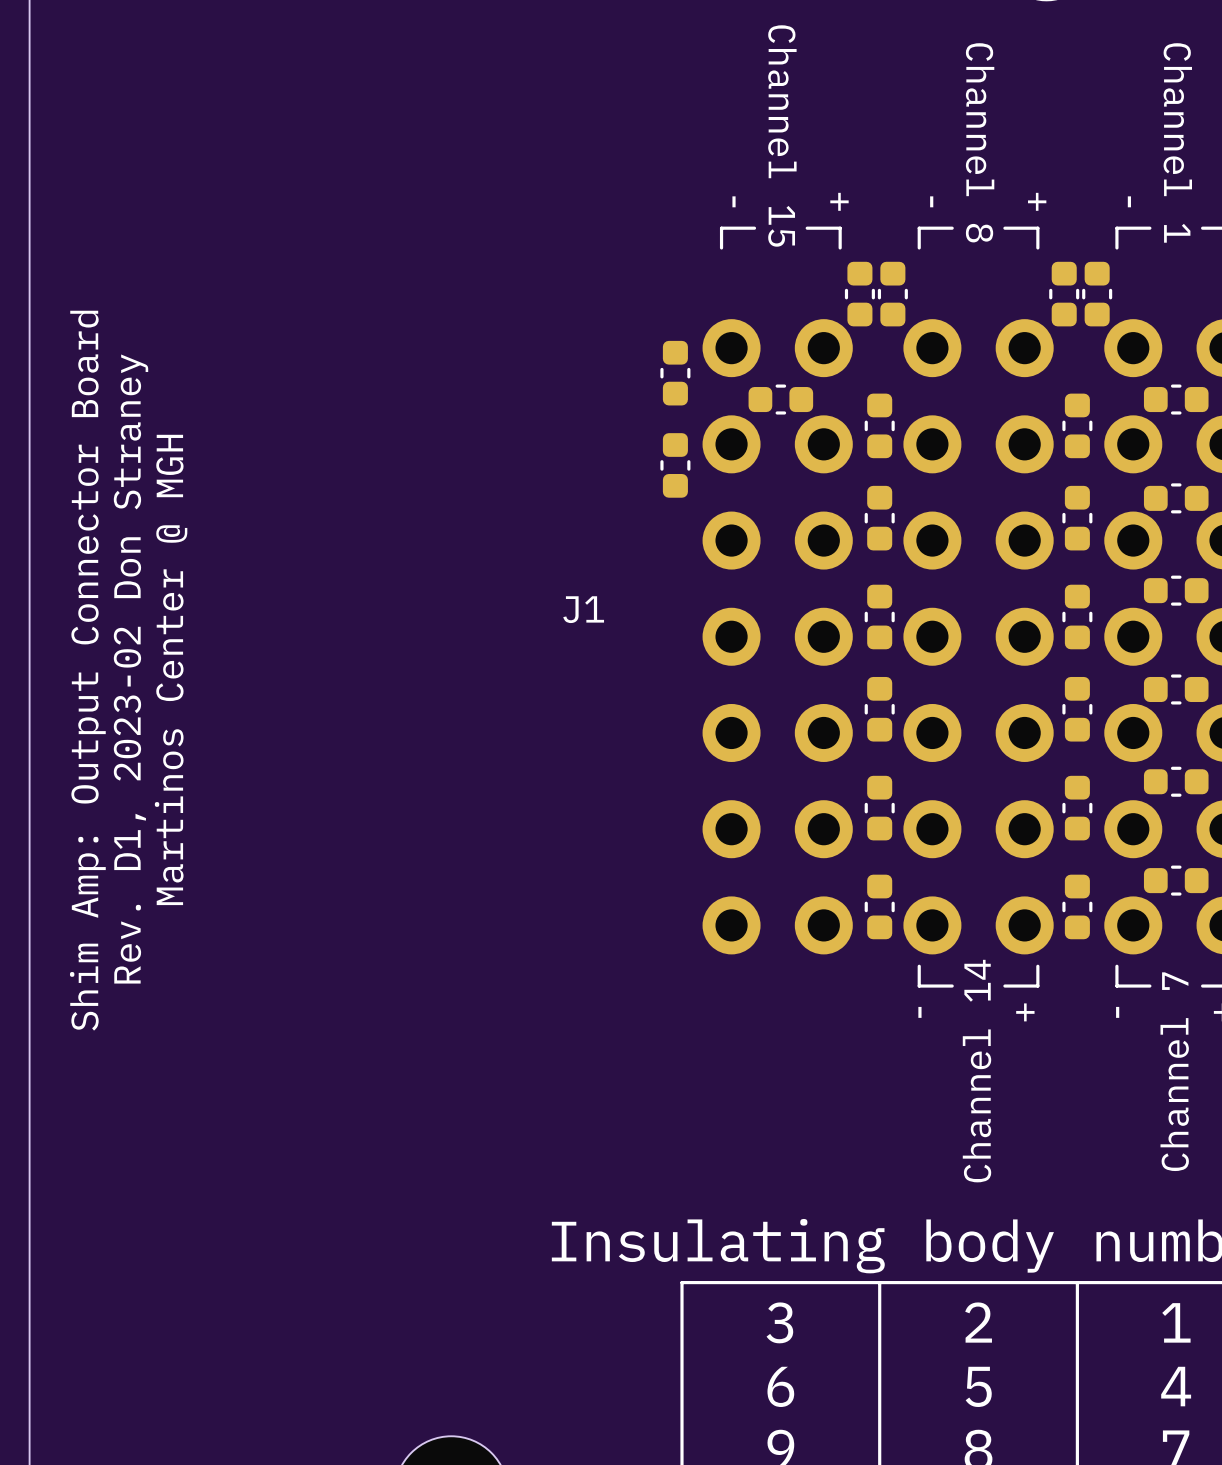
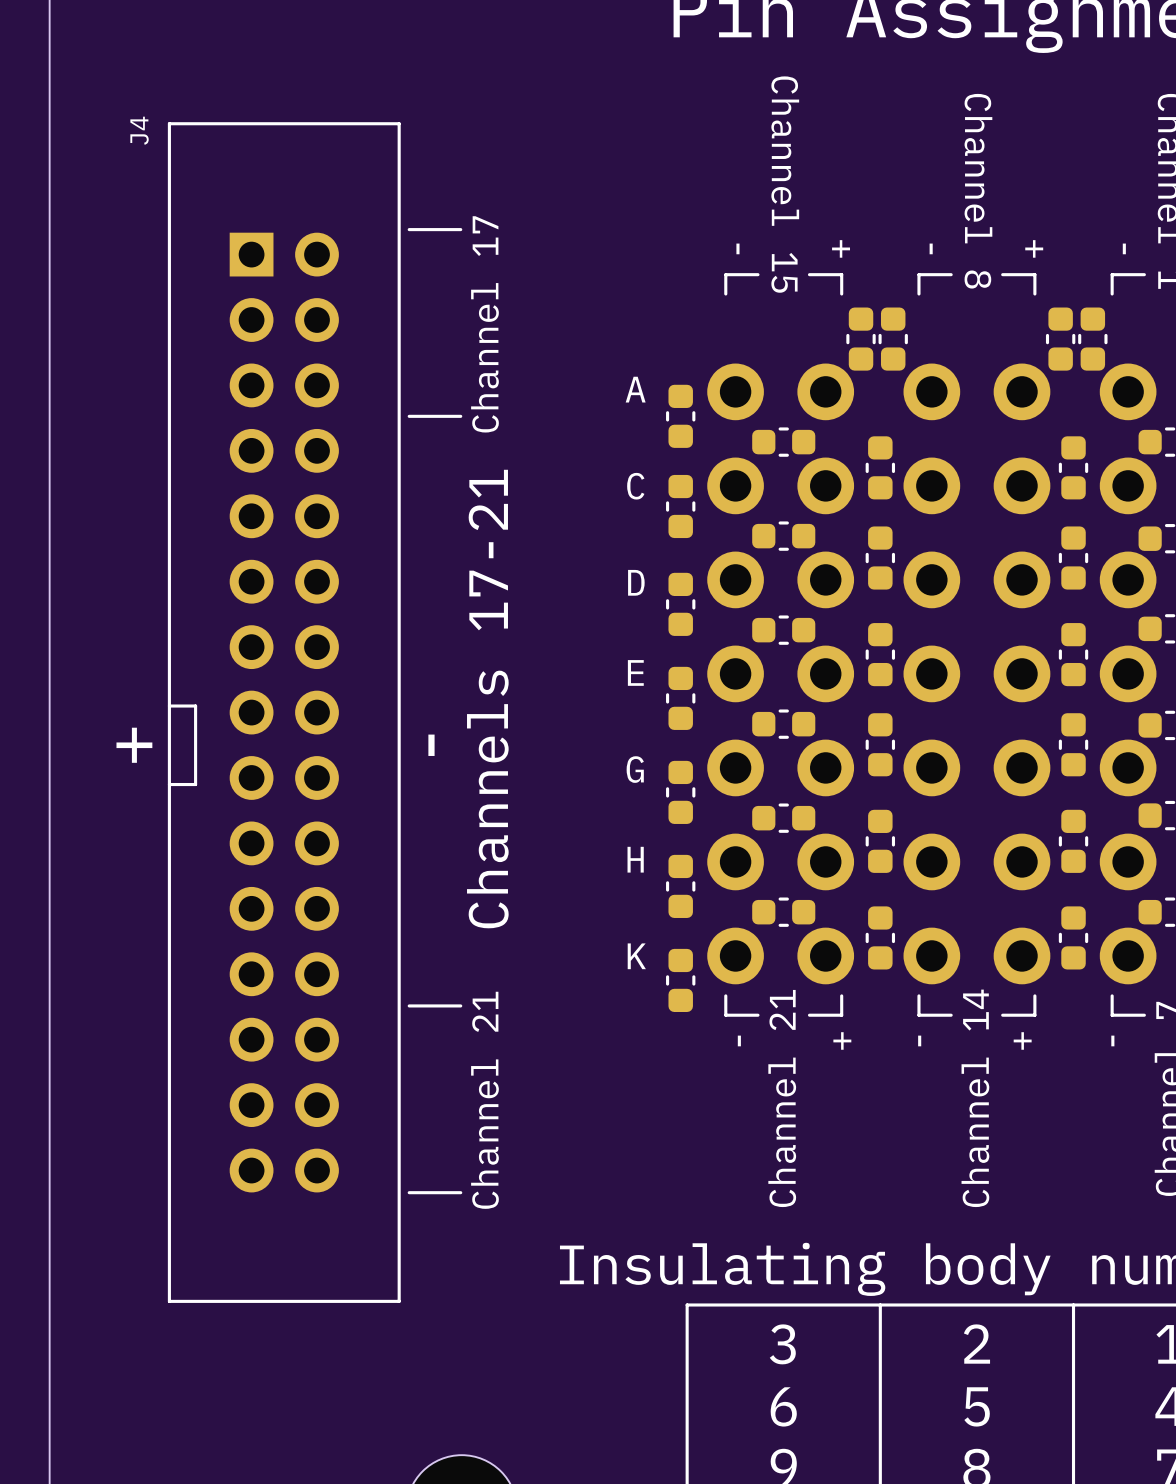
line: none -> (409, 229) (460, 229)
text: none -> Channel 17 (484, 324)
text: none -> A (635, 389)
line: none -> (409, 416) (460, 416)
text: none -> C (635, 486)
part: none -> (783, 536)
text: none -> D (636, 582)
part: none -> (680, 604)
part: none -> (783, 630)
J1 name: J1 (583, 609) -> none
text: none -> E (635, 672)
part: none -> (680, 698)
text: none -> Channels 17-21 (487, 699)
text: Rev. D1, 2023-02 Don Straney (131, 669) -> none
text: Martinos Center @ MGH (171, 669) -> none
text: Shim Amp: Output Connector Board (87, 670) -> none
J4: none -> (284, 712)
part: none -> (783, 724)
text: none -> G (635, 769)
part: none -> (680, 792)
part: none -> (783, 818)
text: none -> H (635, 859)
part: none -> (680, 886)
part: none -> (783, 912)
text: none -> K (636, 956)
part: none -> (680, 980)
line: none -> (725, 995) (725, 1015) (757, 1015)
line: none -> (841, 995) (841, 1015) (809, 1015)
line: none -> (409, 1005) (460, 1005)
text: none -> - (739, 1040)
text: none -> + (842, 1040)
text: none -> Channel 21 (782, 1098)
text: none -> Channel 21 (484, 1100)
line: none -> (409, 1192) (460, 1192)

